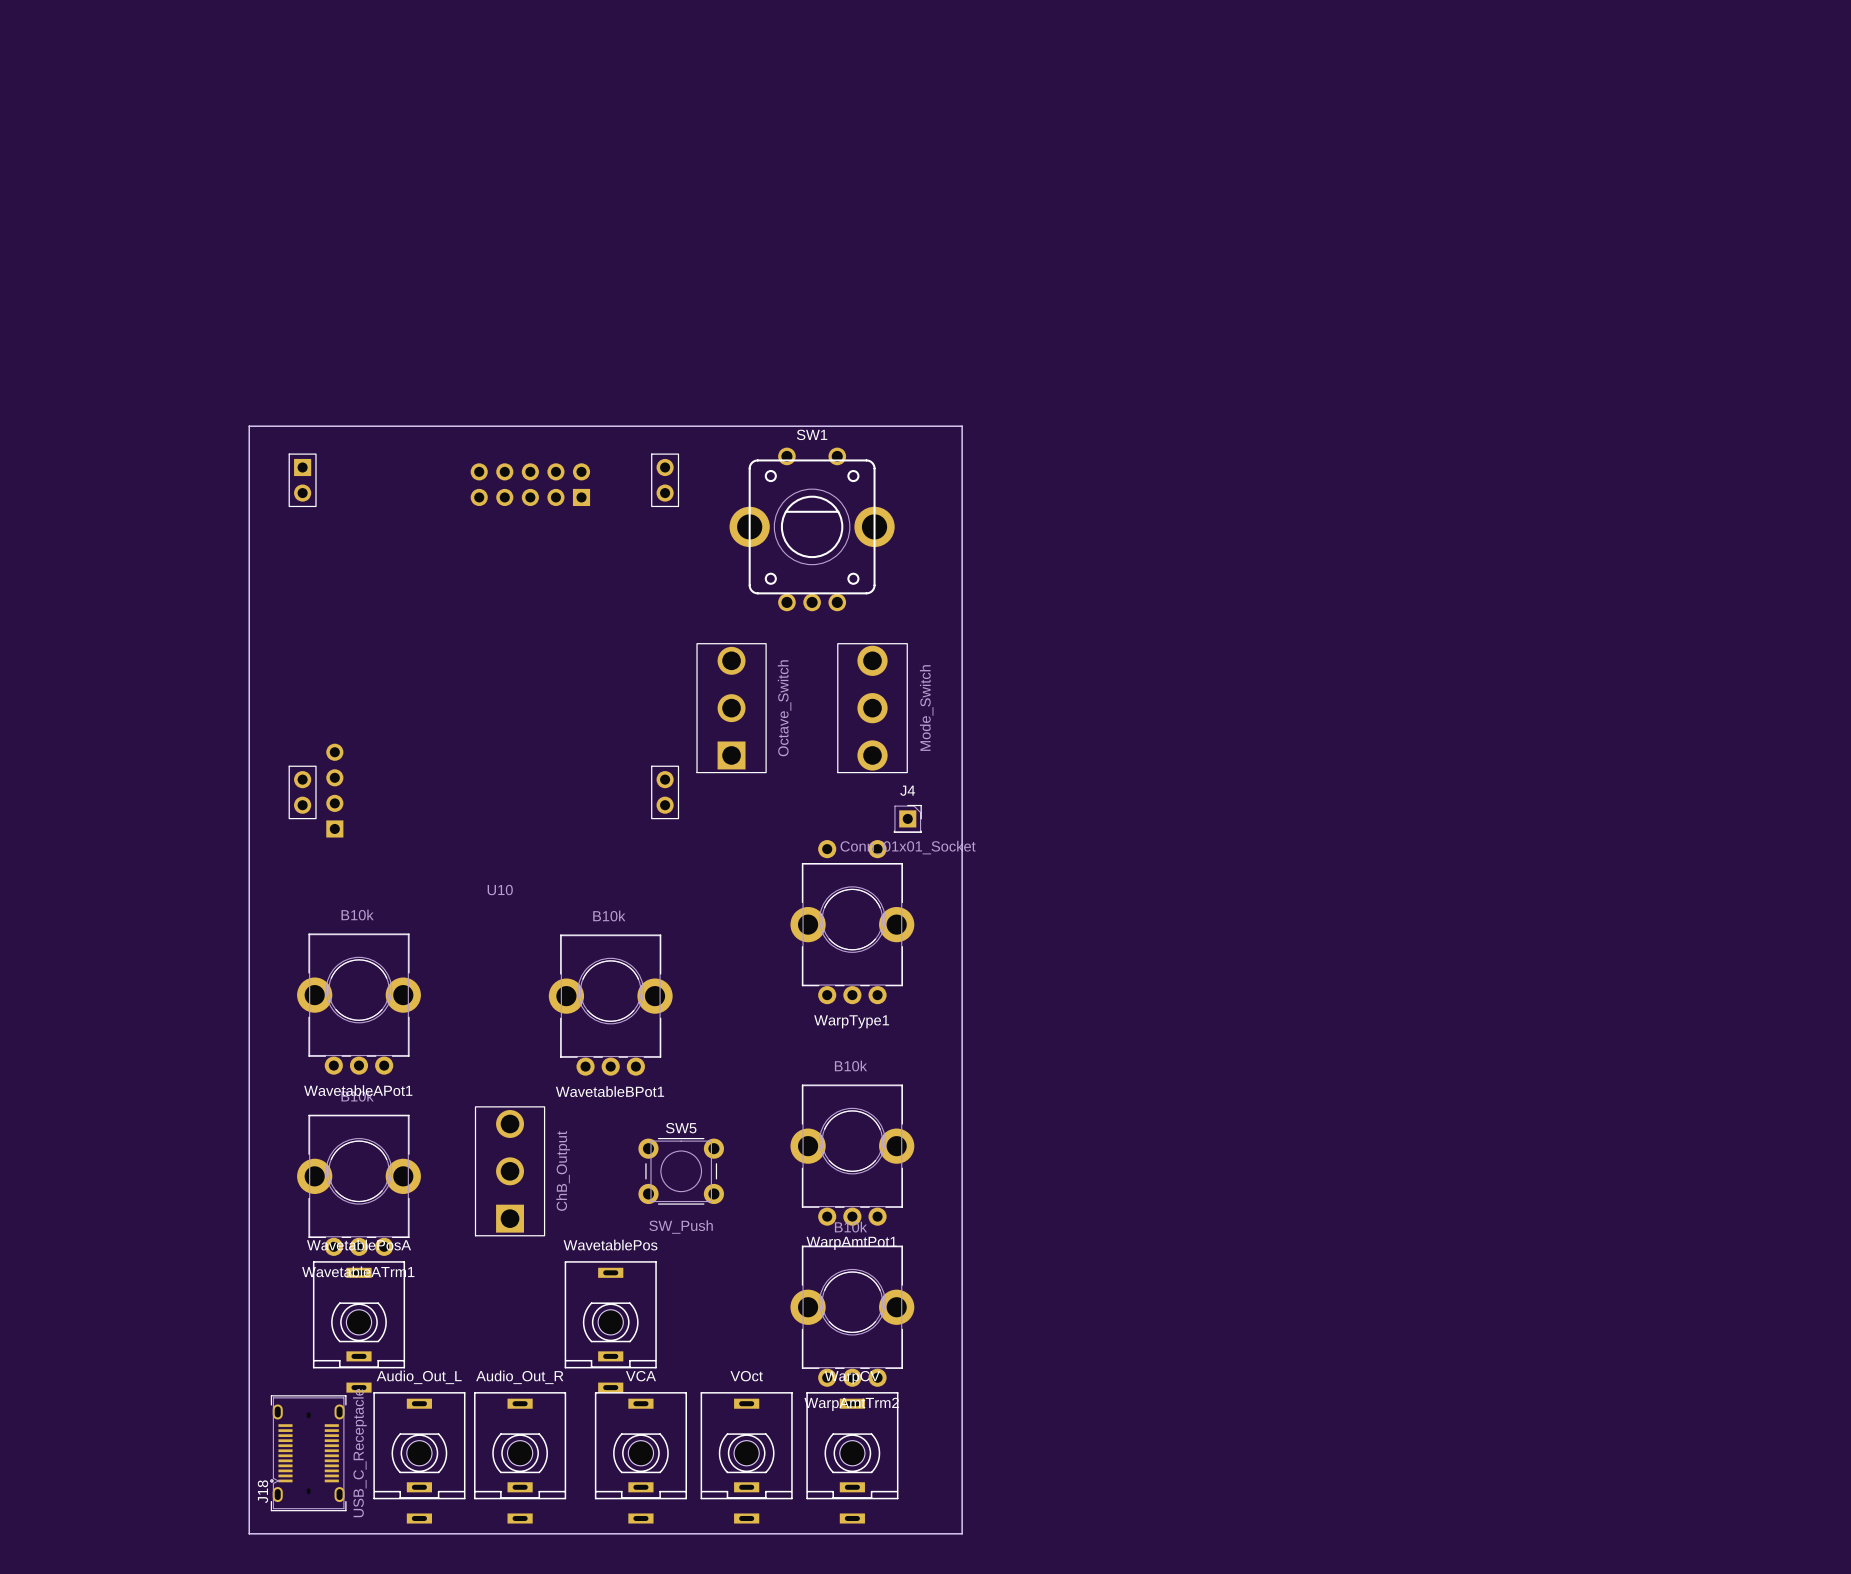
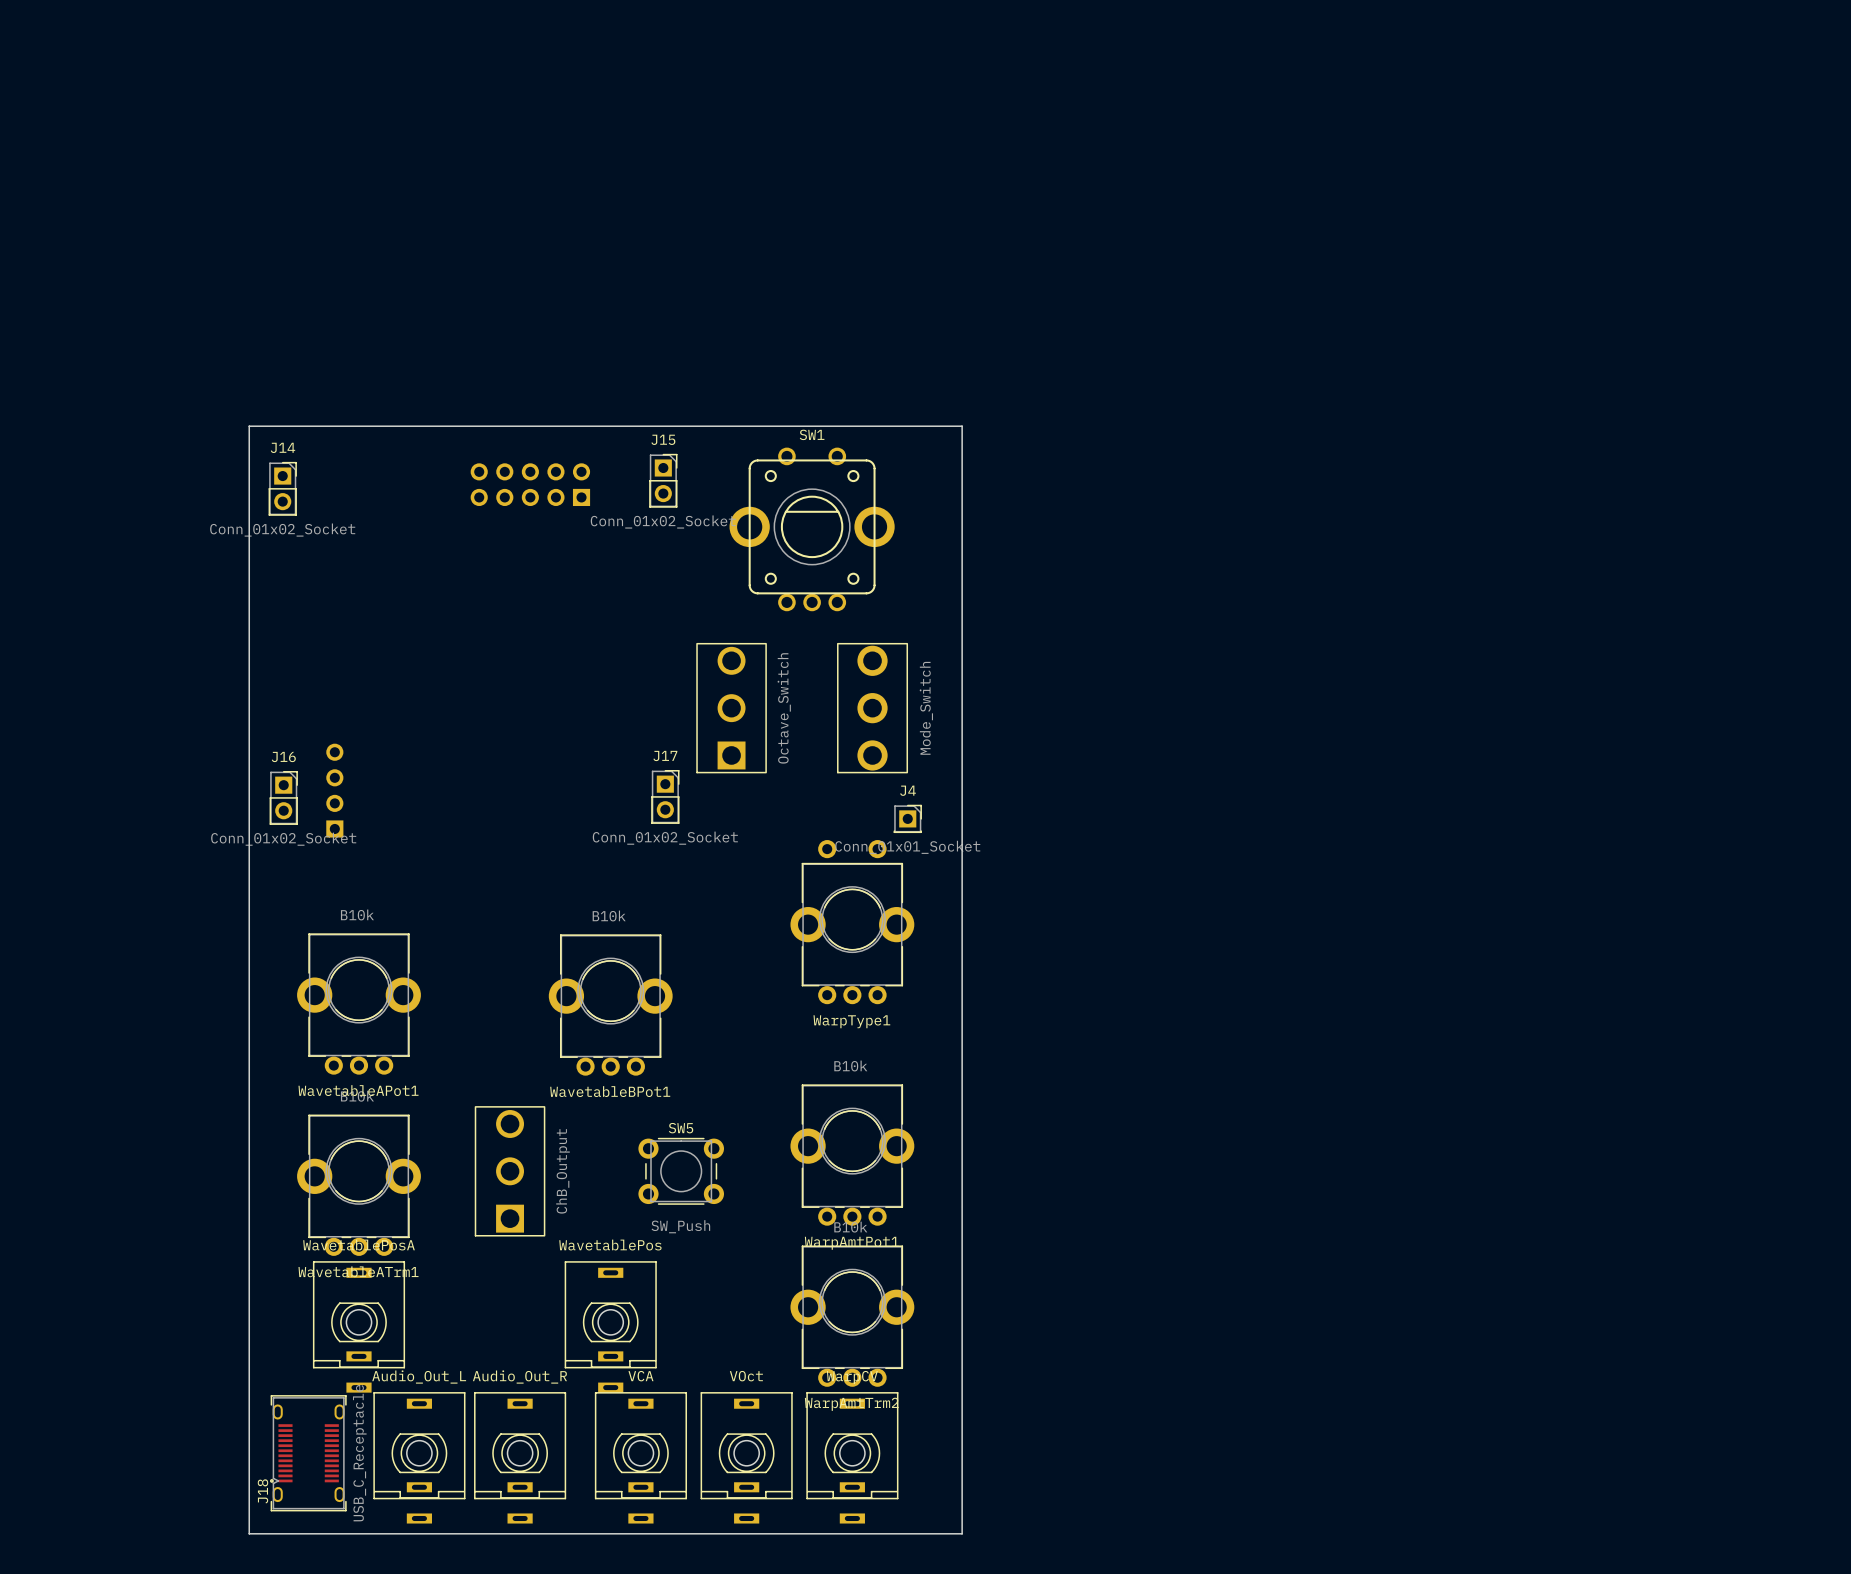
J15: none -> Conn_01x02_Socket (663, 480)
J14: none -> Conn_01x02_Socket (282, 488)
U10: (483, 636) -> none
J17: none -> Conn_01x02_Socket (665, 796)
J16: none -> Conn_01x02_Socket (283, 797)

